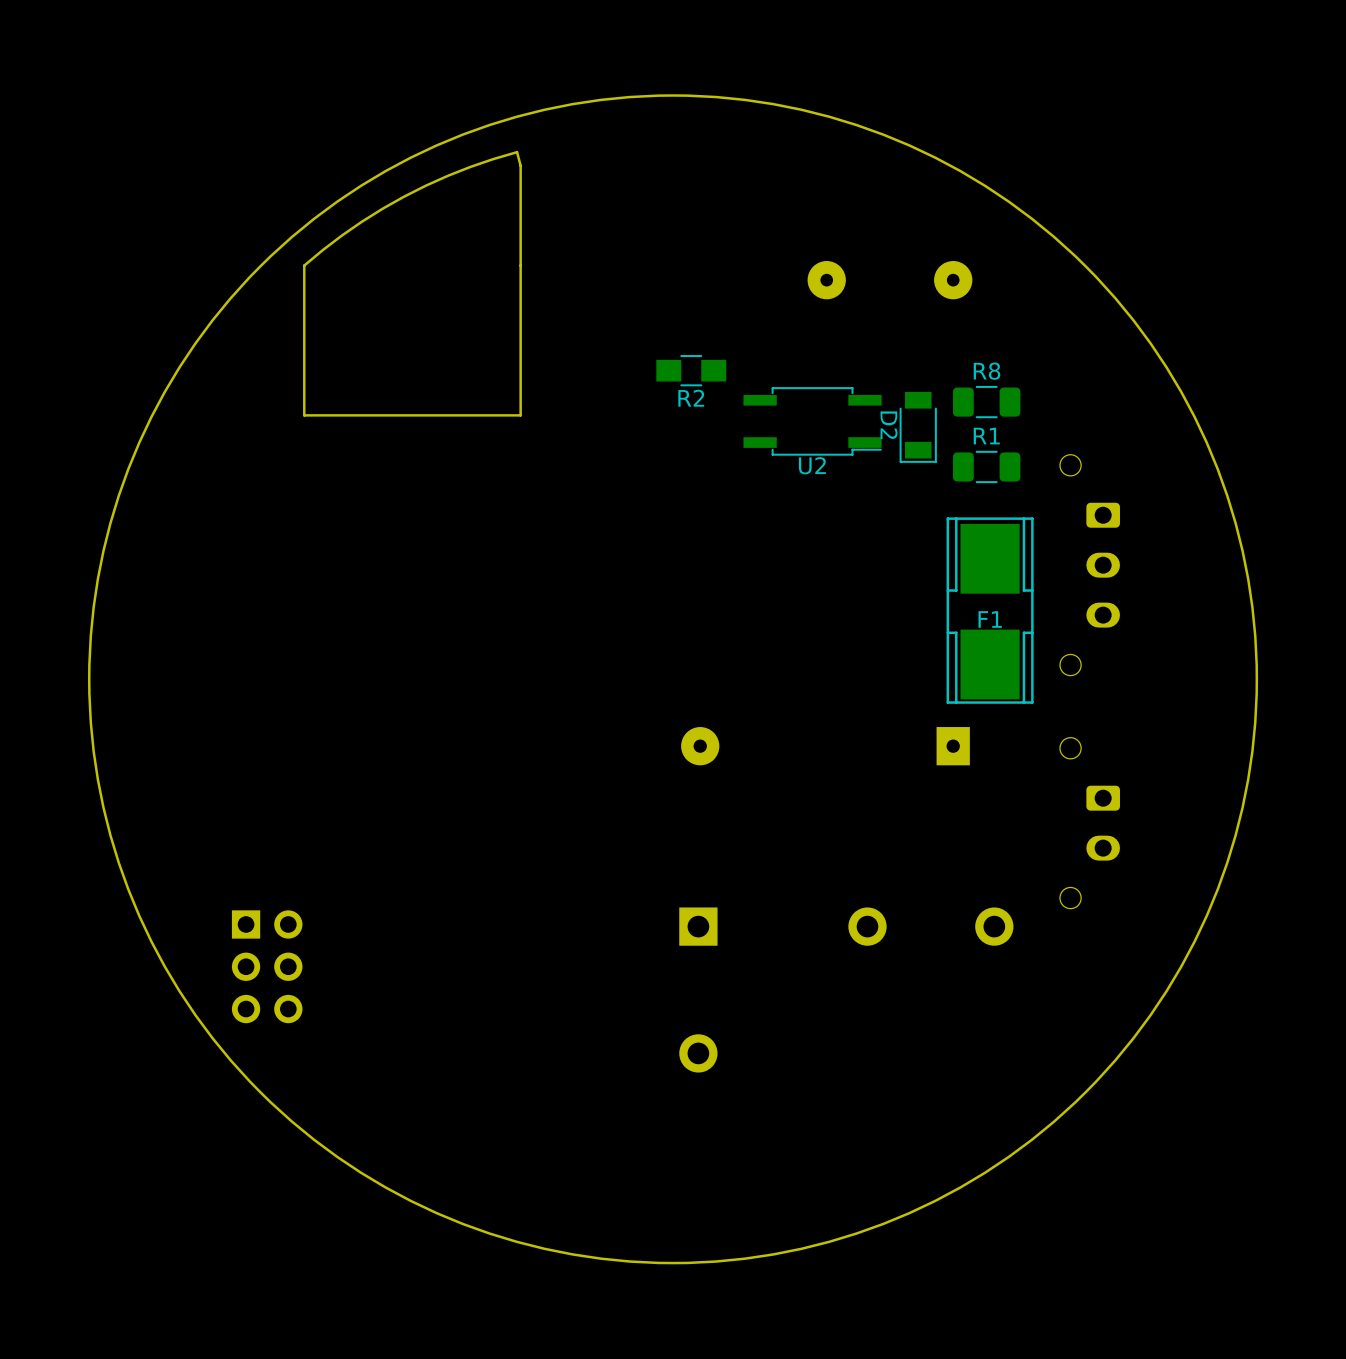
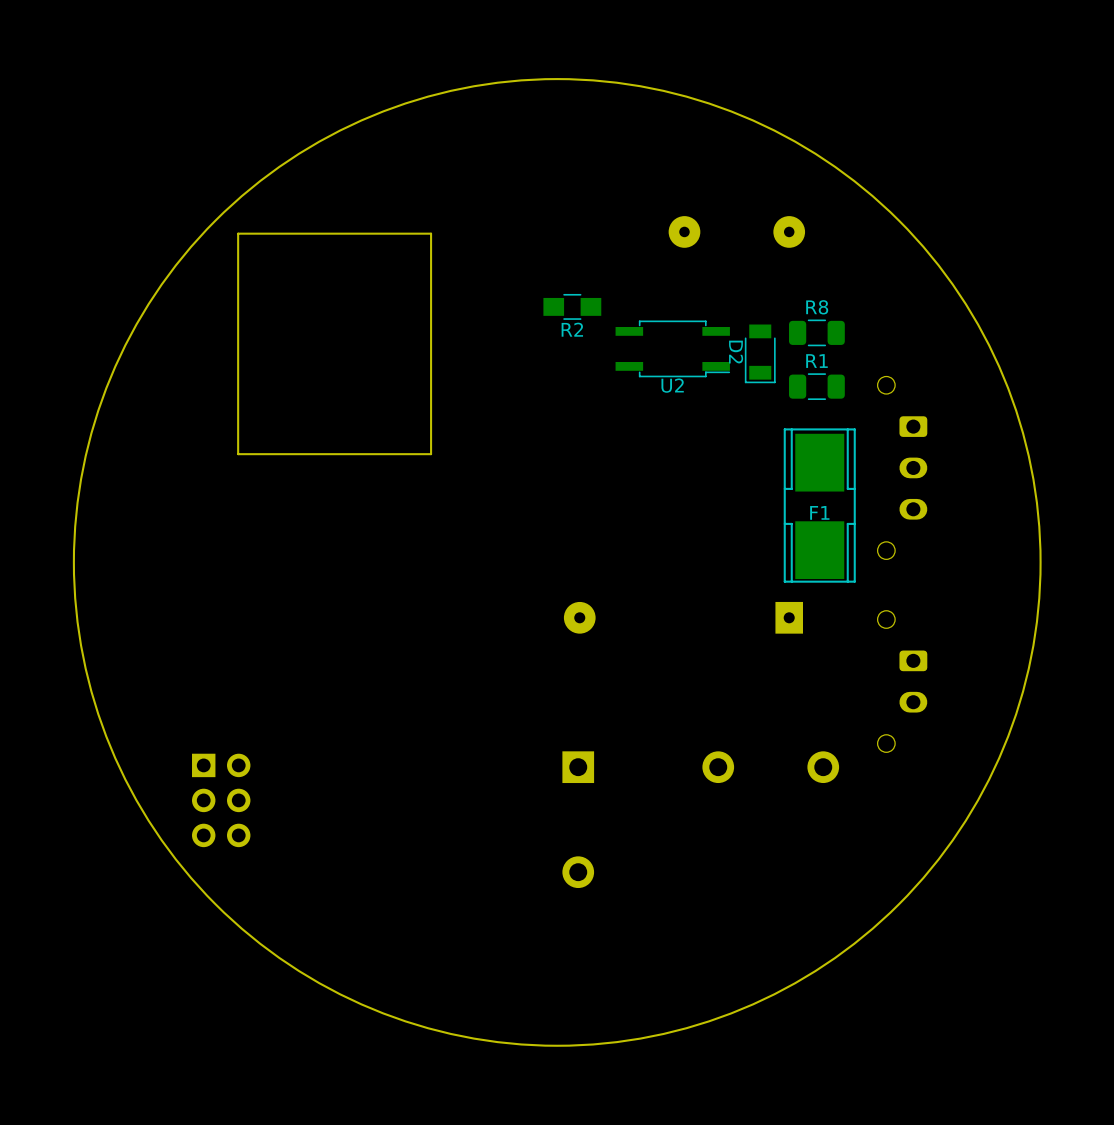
board edge: (520, 282) (520, 165) (517, 152) (448, 175) (404, 196) (362, 221) (304, 265) (304, 415) (520, 415) -> (431, 233) (238, 233) (238, 454) (431, 454) (431, 343)

